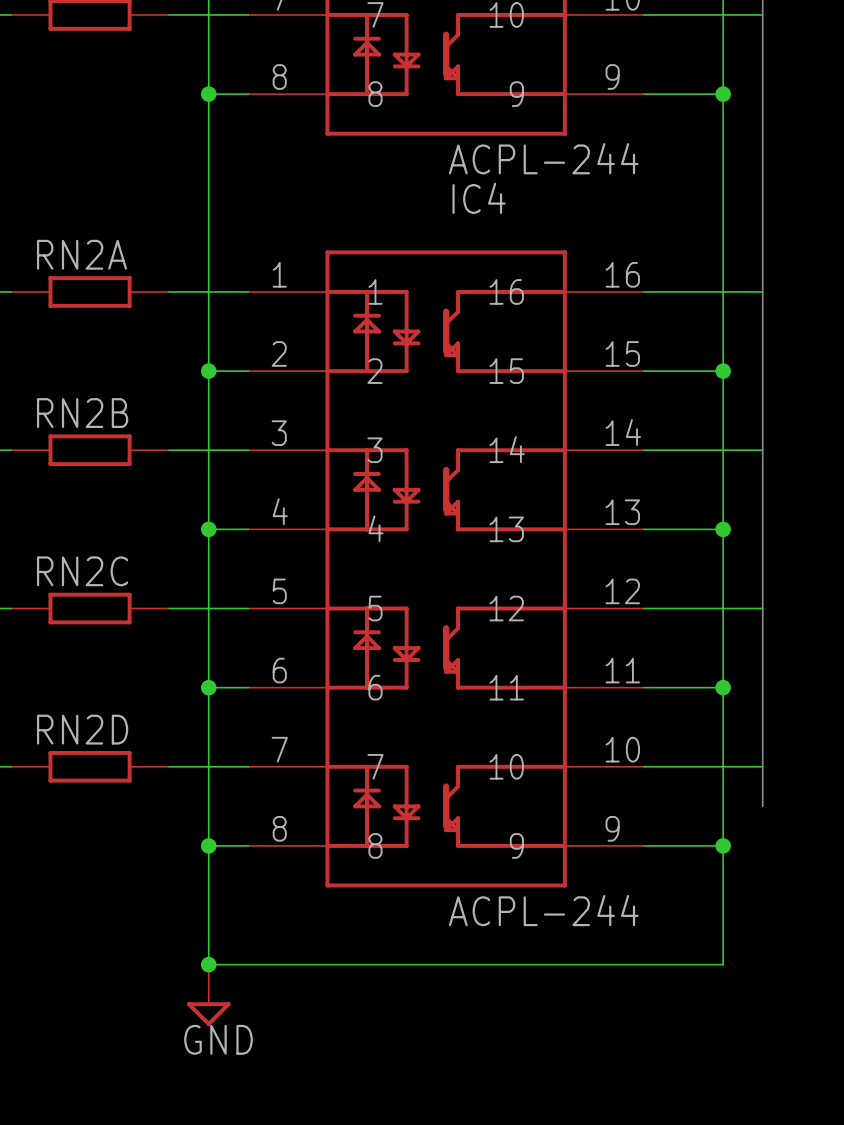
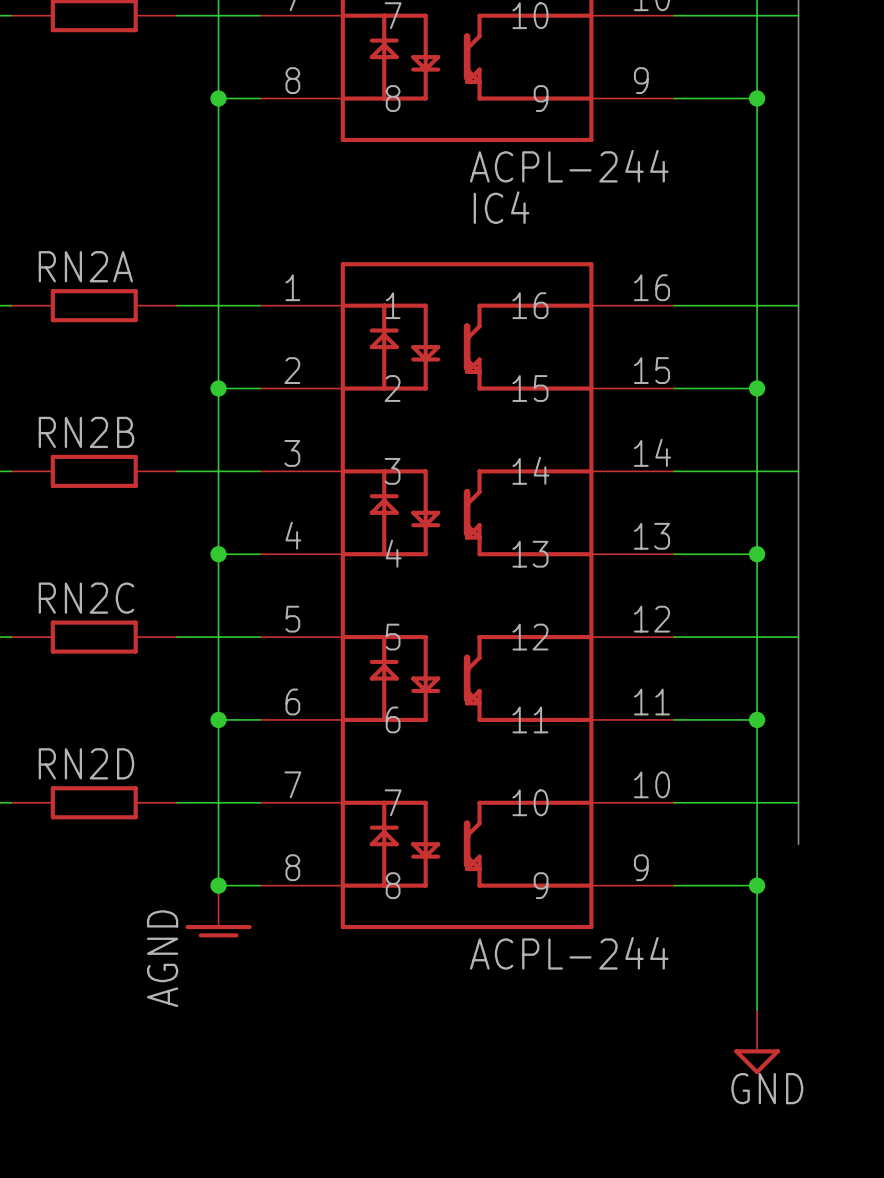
wire: (208, 845) (208, 964) (723, 964) -> none
power symbol: none -> AGND (218, 911)
junction: (208, 964) -> none
power symbol: GND (208, 995) -> none
power symbol: none -> GND (757, 1042)

